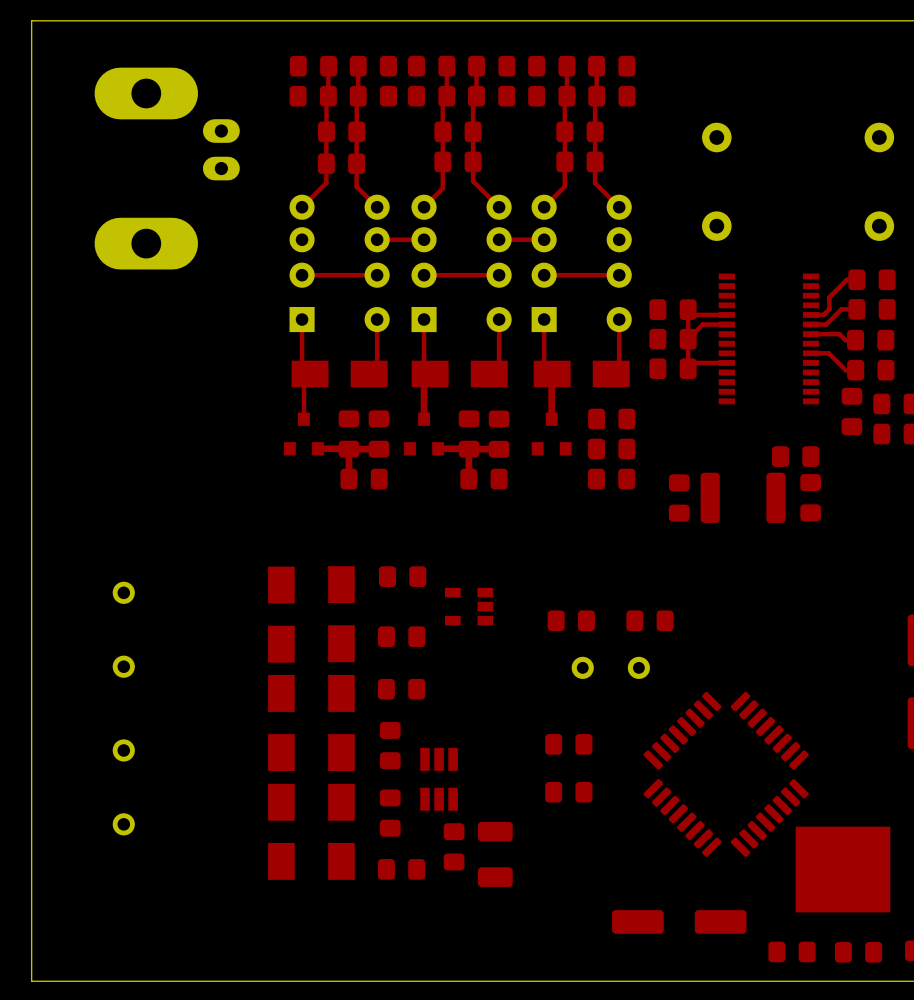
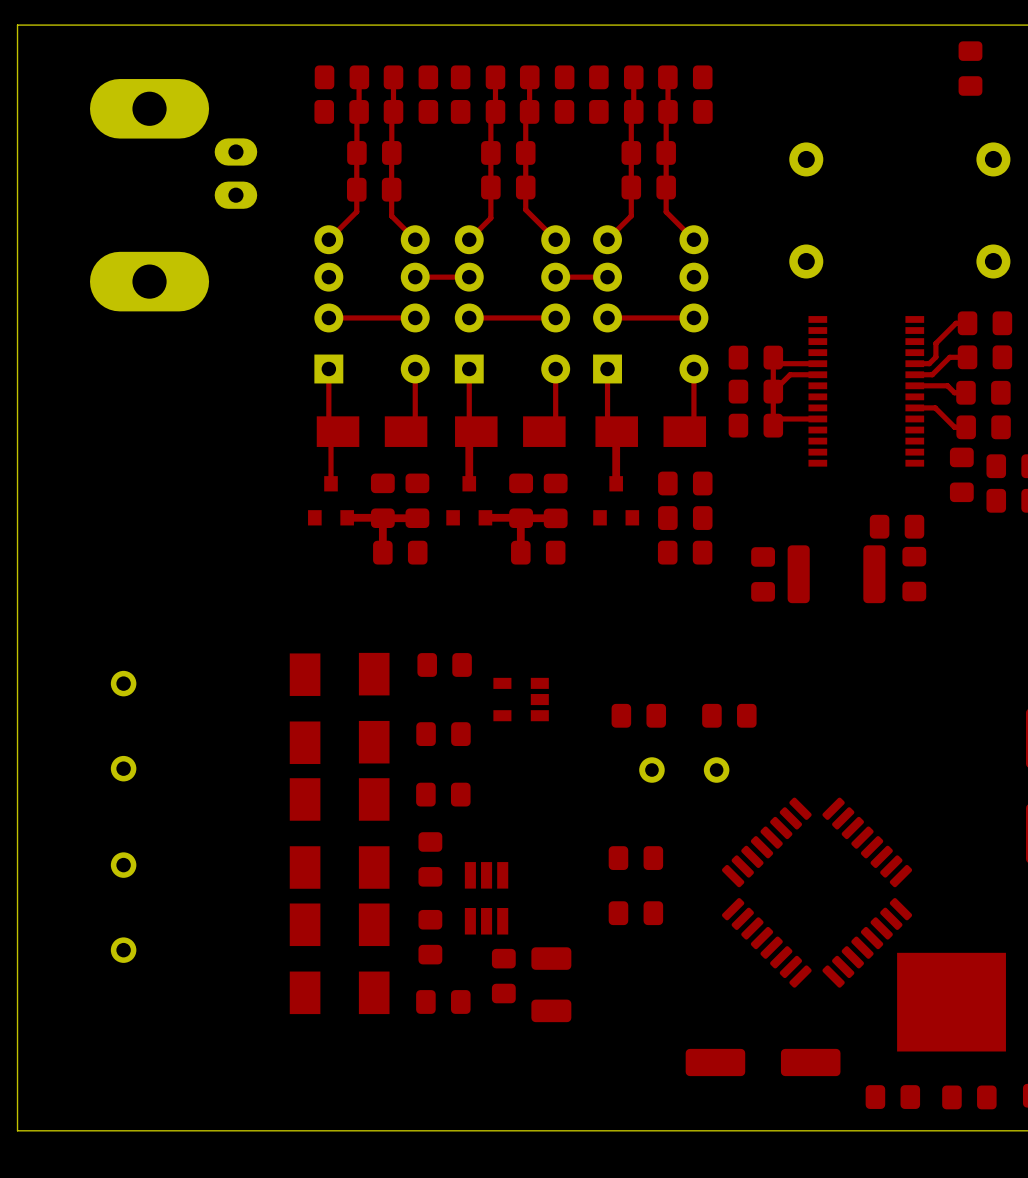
part: none -> (970, 68)

